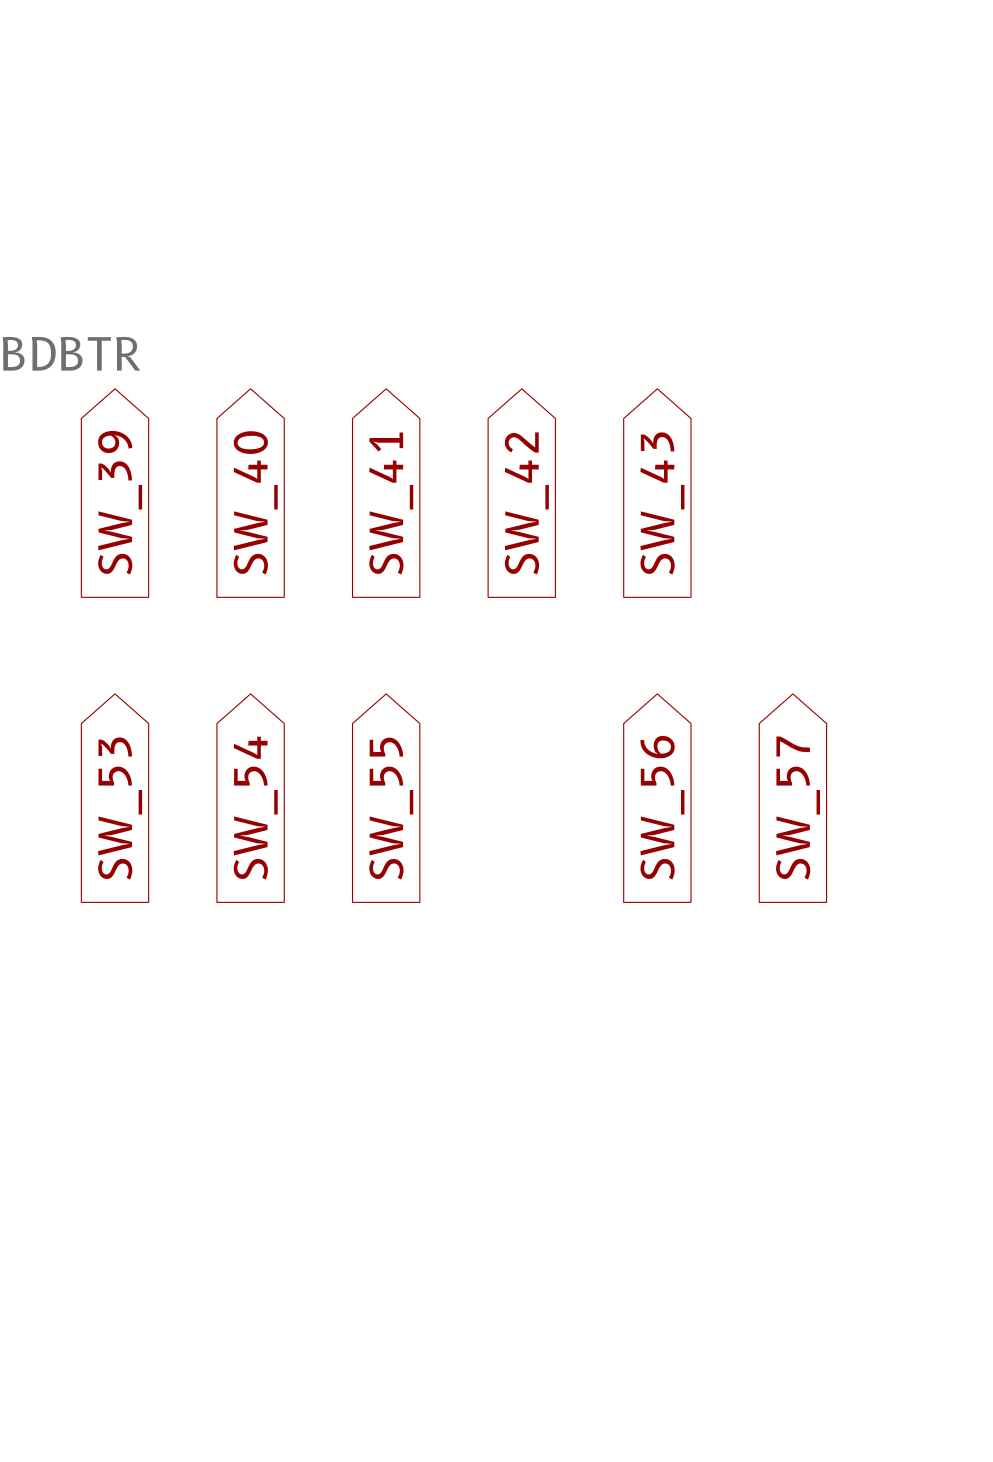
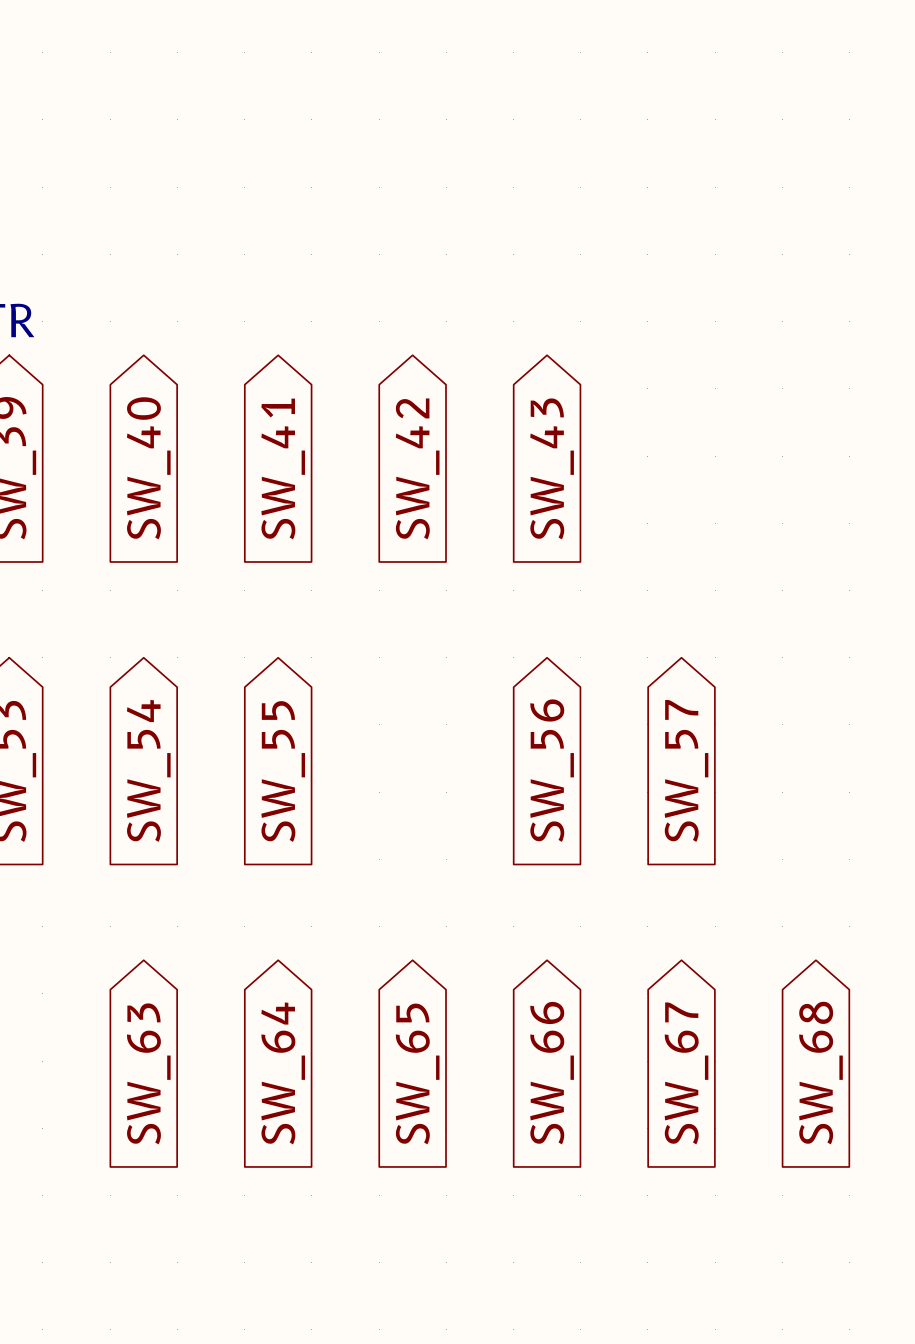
global label: none -> SW_66 (552, 1073)
global label: none -> SW_68 (820, 1073)
global label: none -> SW_63 (148, 1073)
global label: none -> SW_64 (283, 1073)
global label: none -> SW_65 (417, 1073)
global label: none -> SW_67 (686, 1073)

